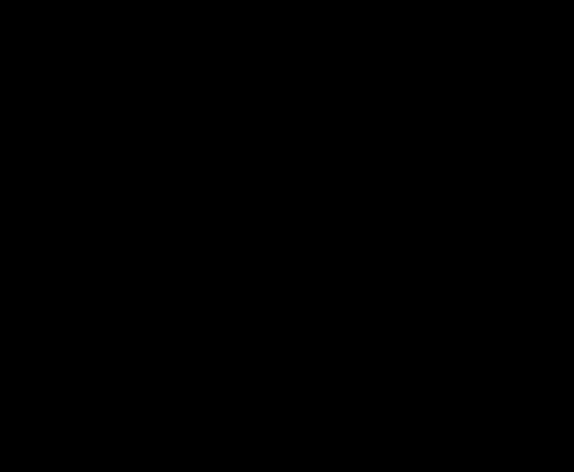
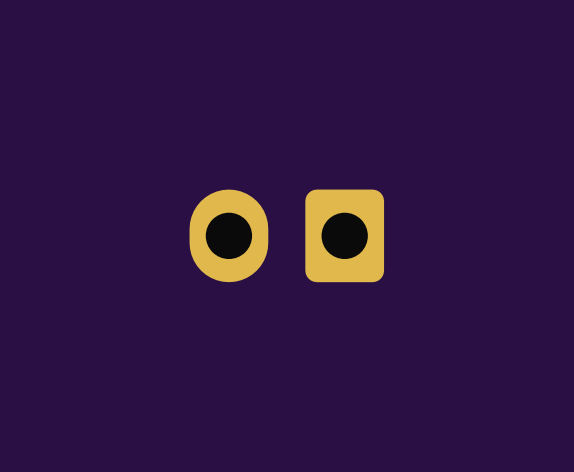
part: none -> (286, 235)

